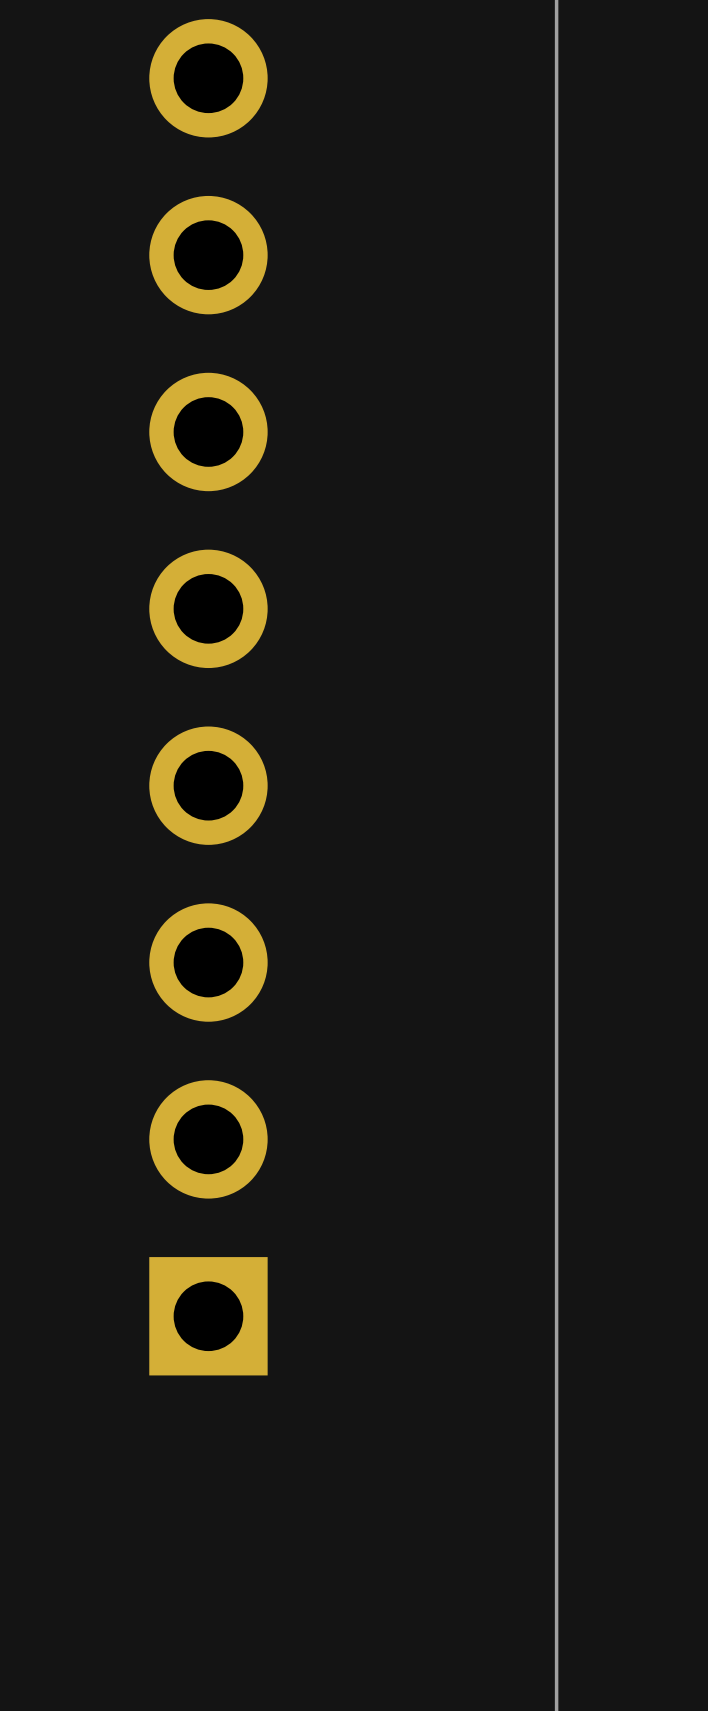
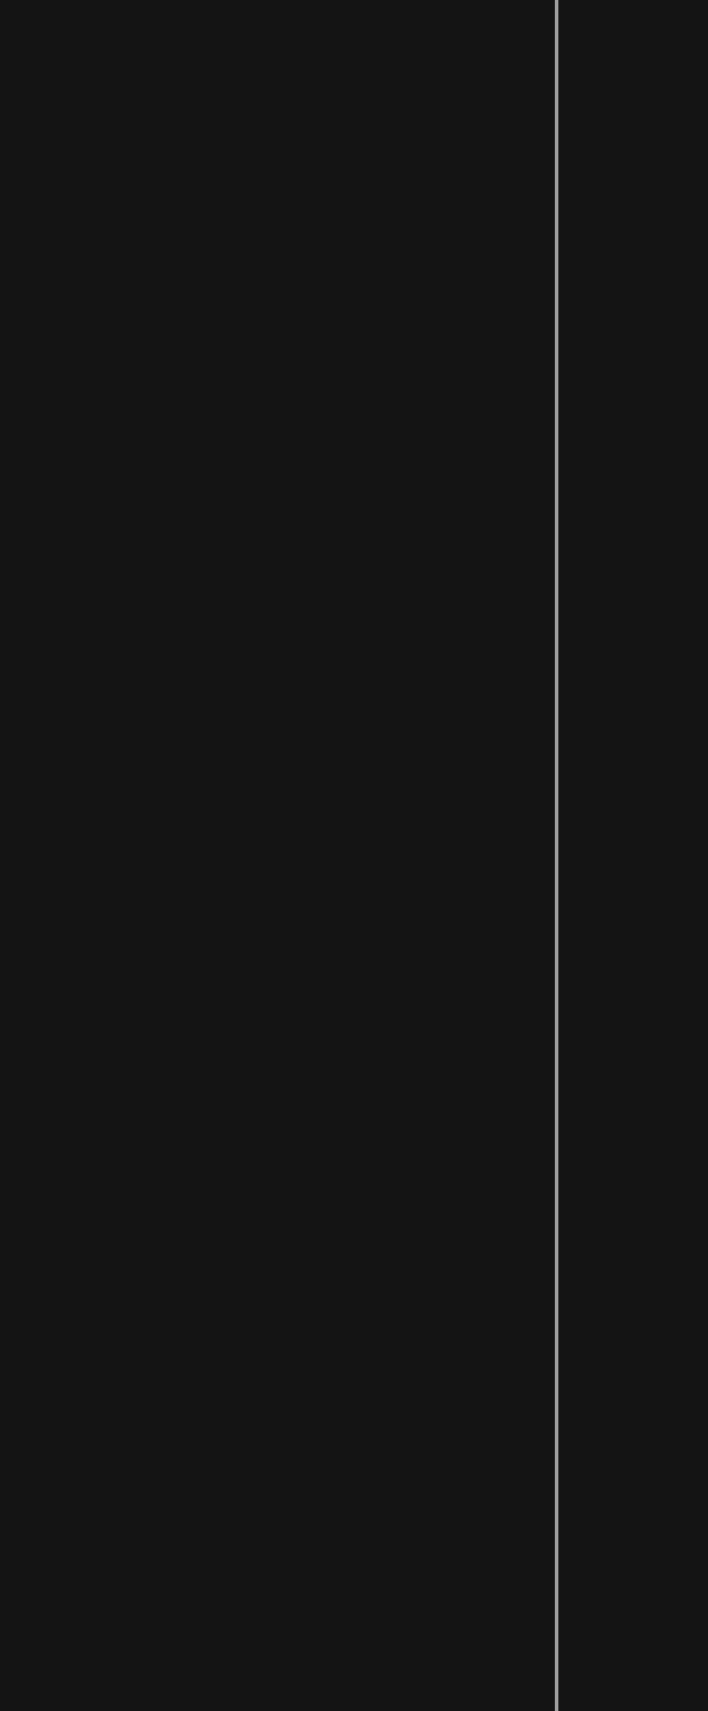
part: (208, 697) -> none

